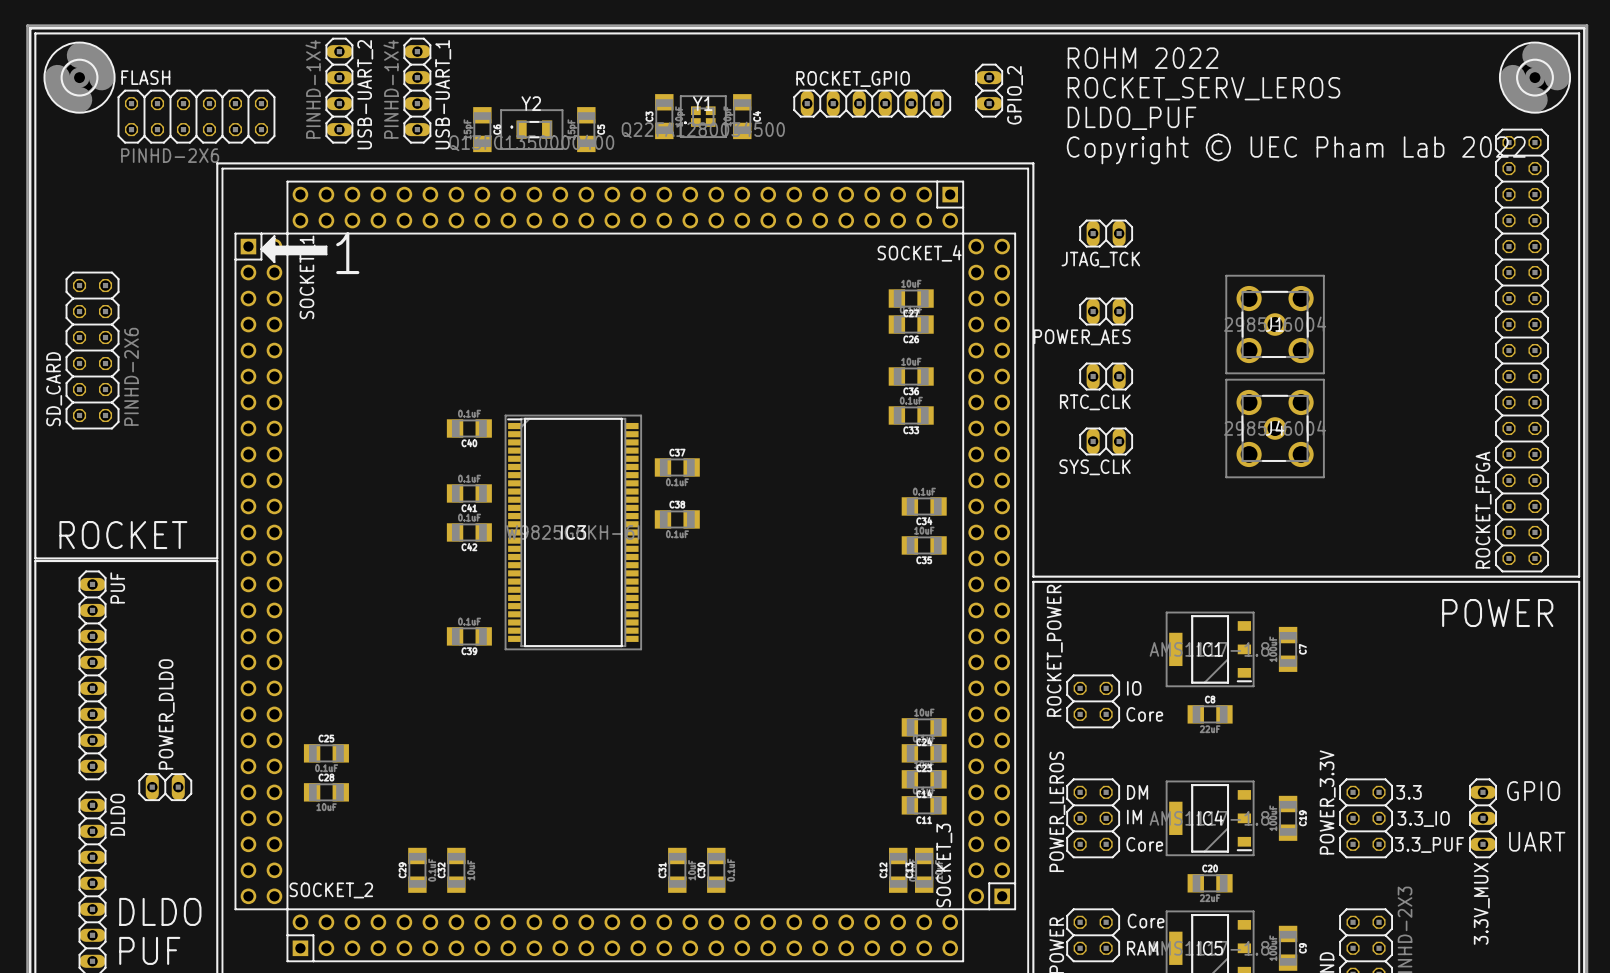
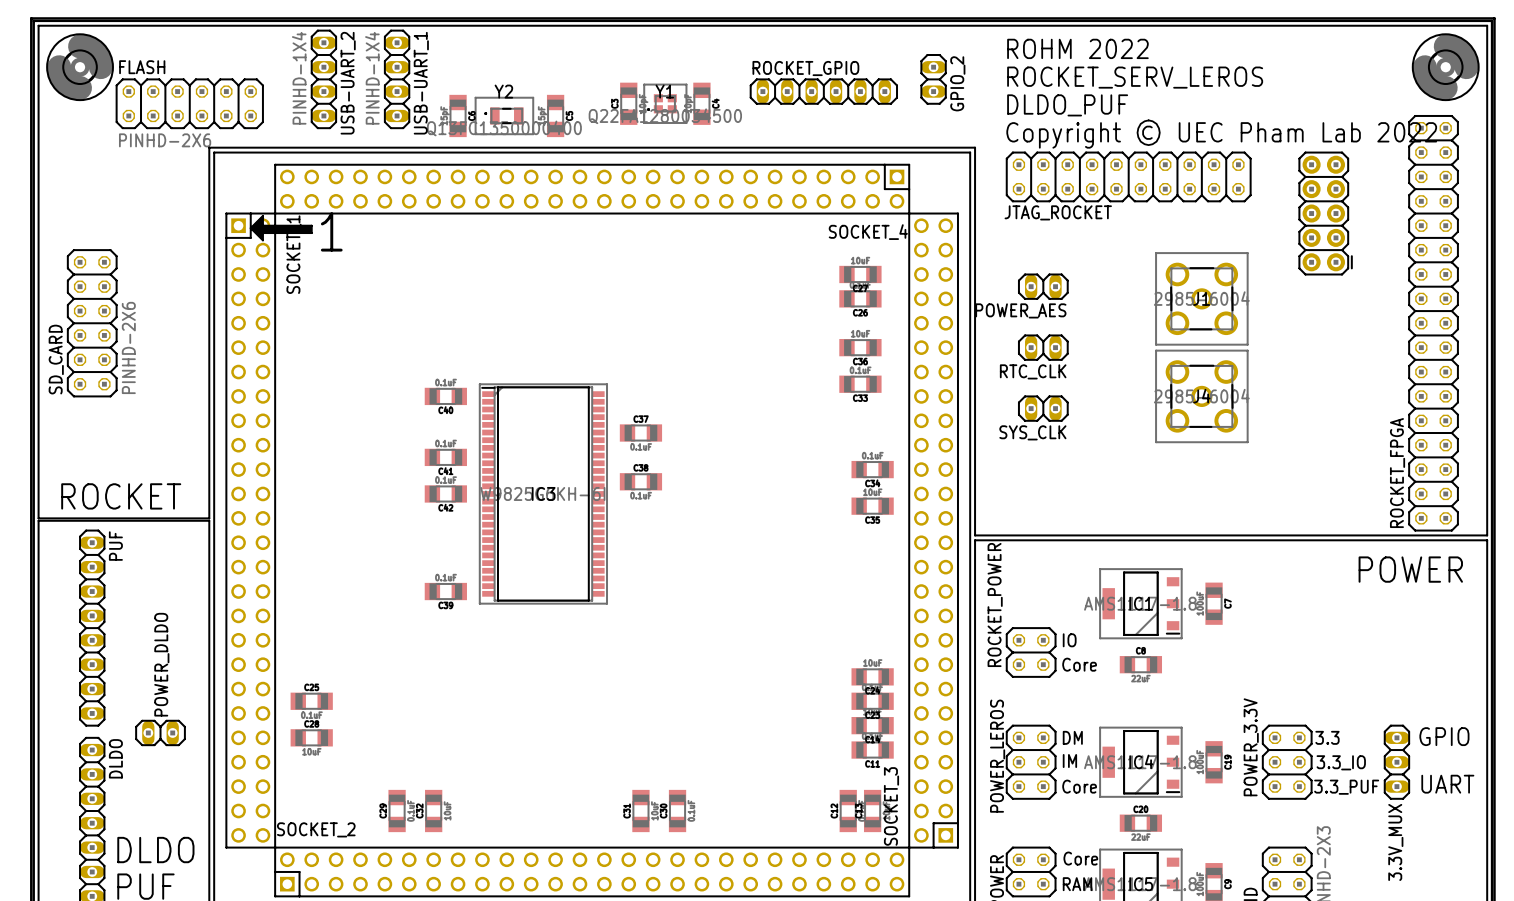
JTAG_ROCKET: none -> (1128, 176)
JTAG_TCK: (1106, 233) -> none
part: none -> (1325, 213)

